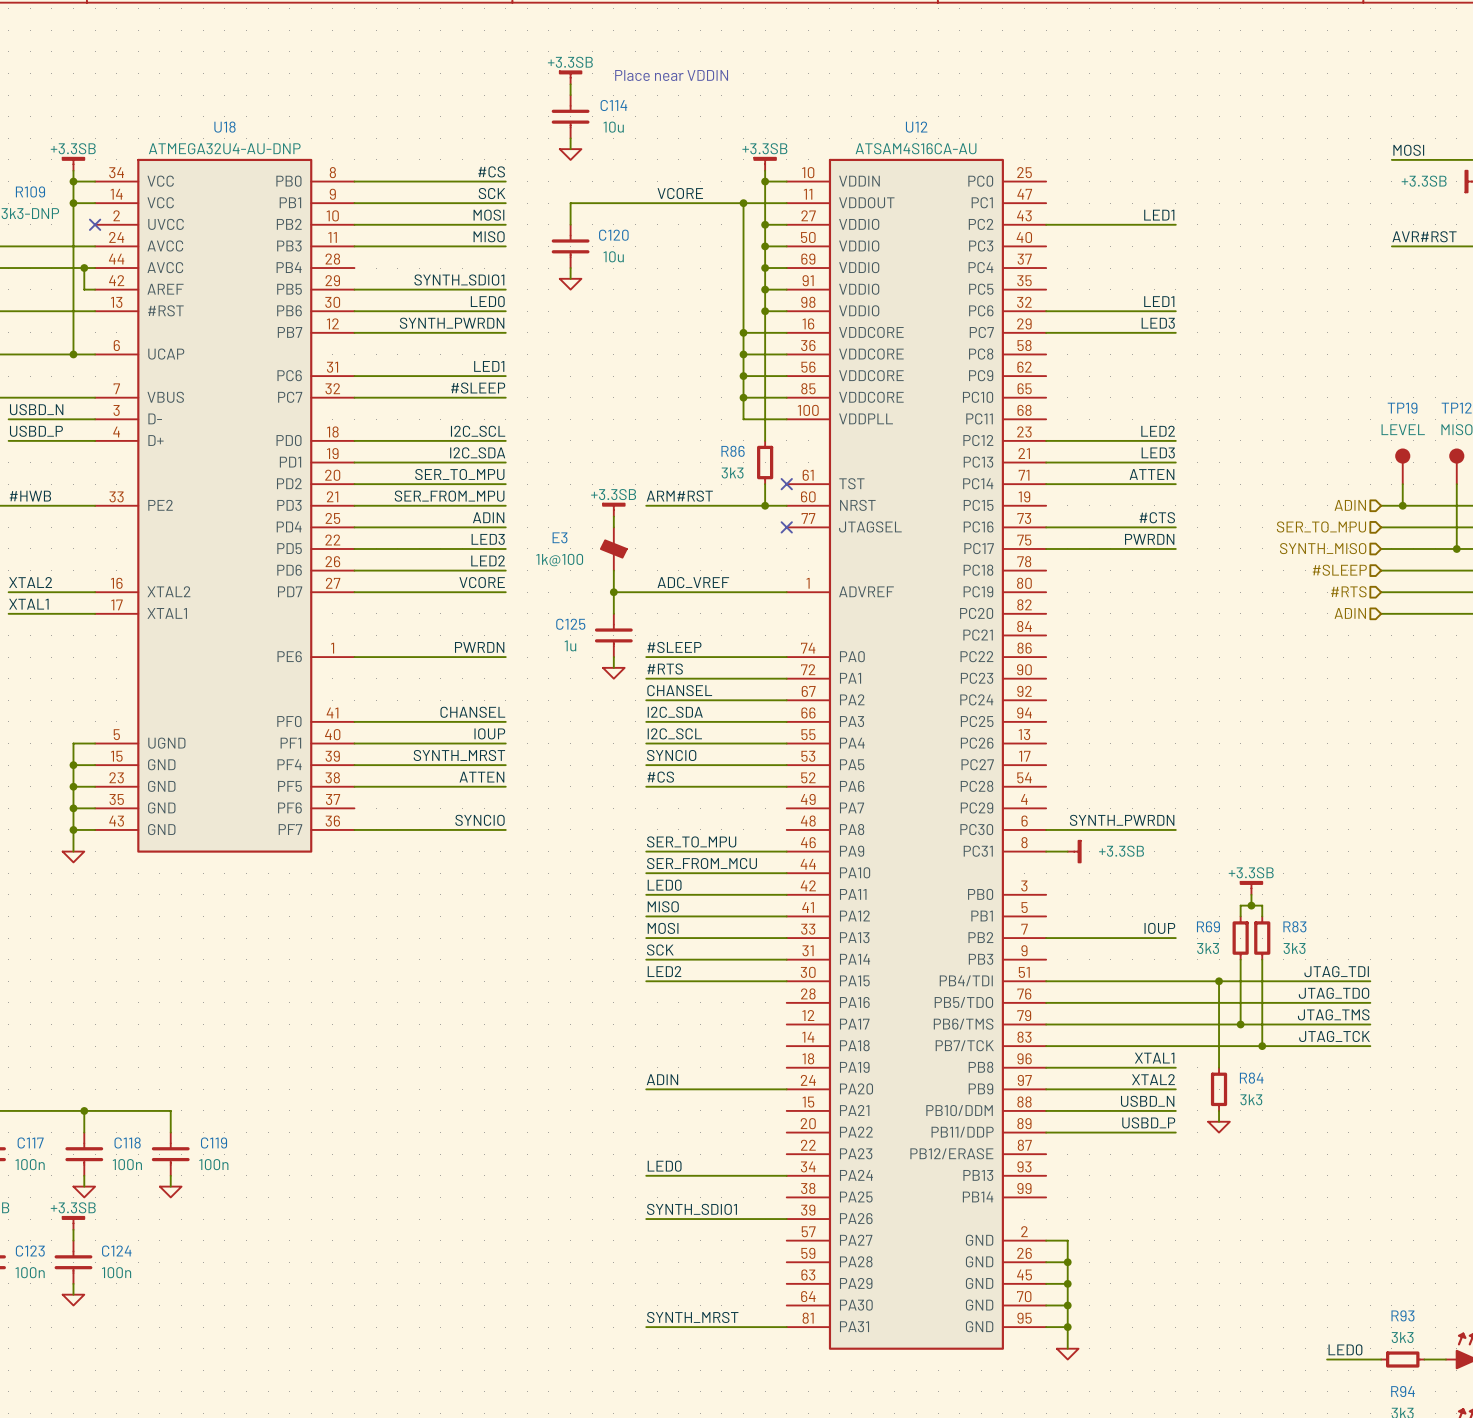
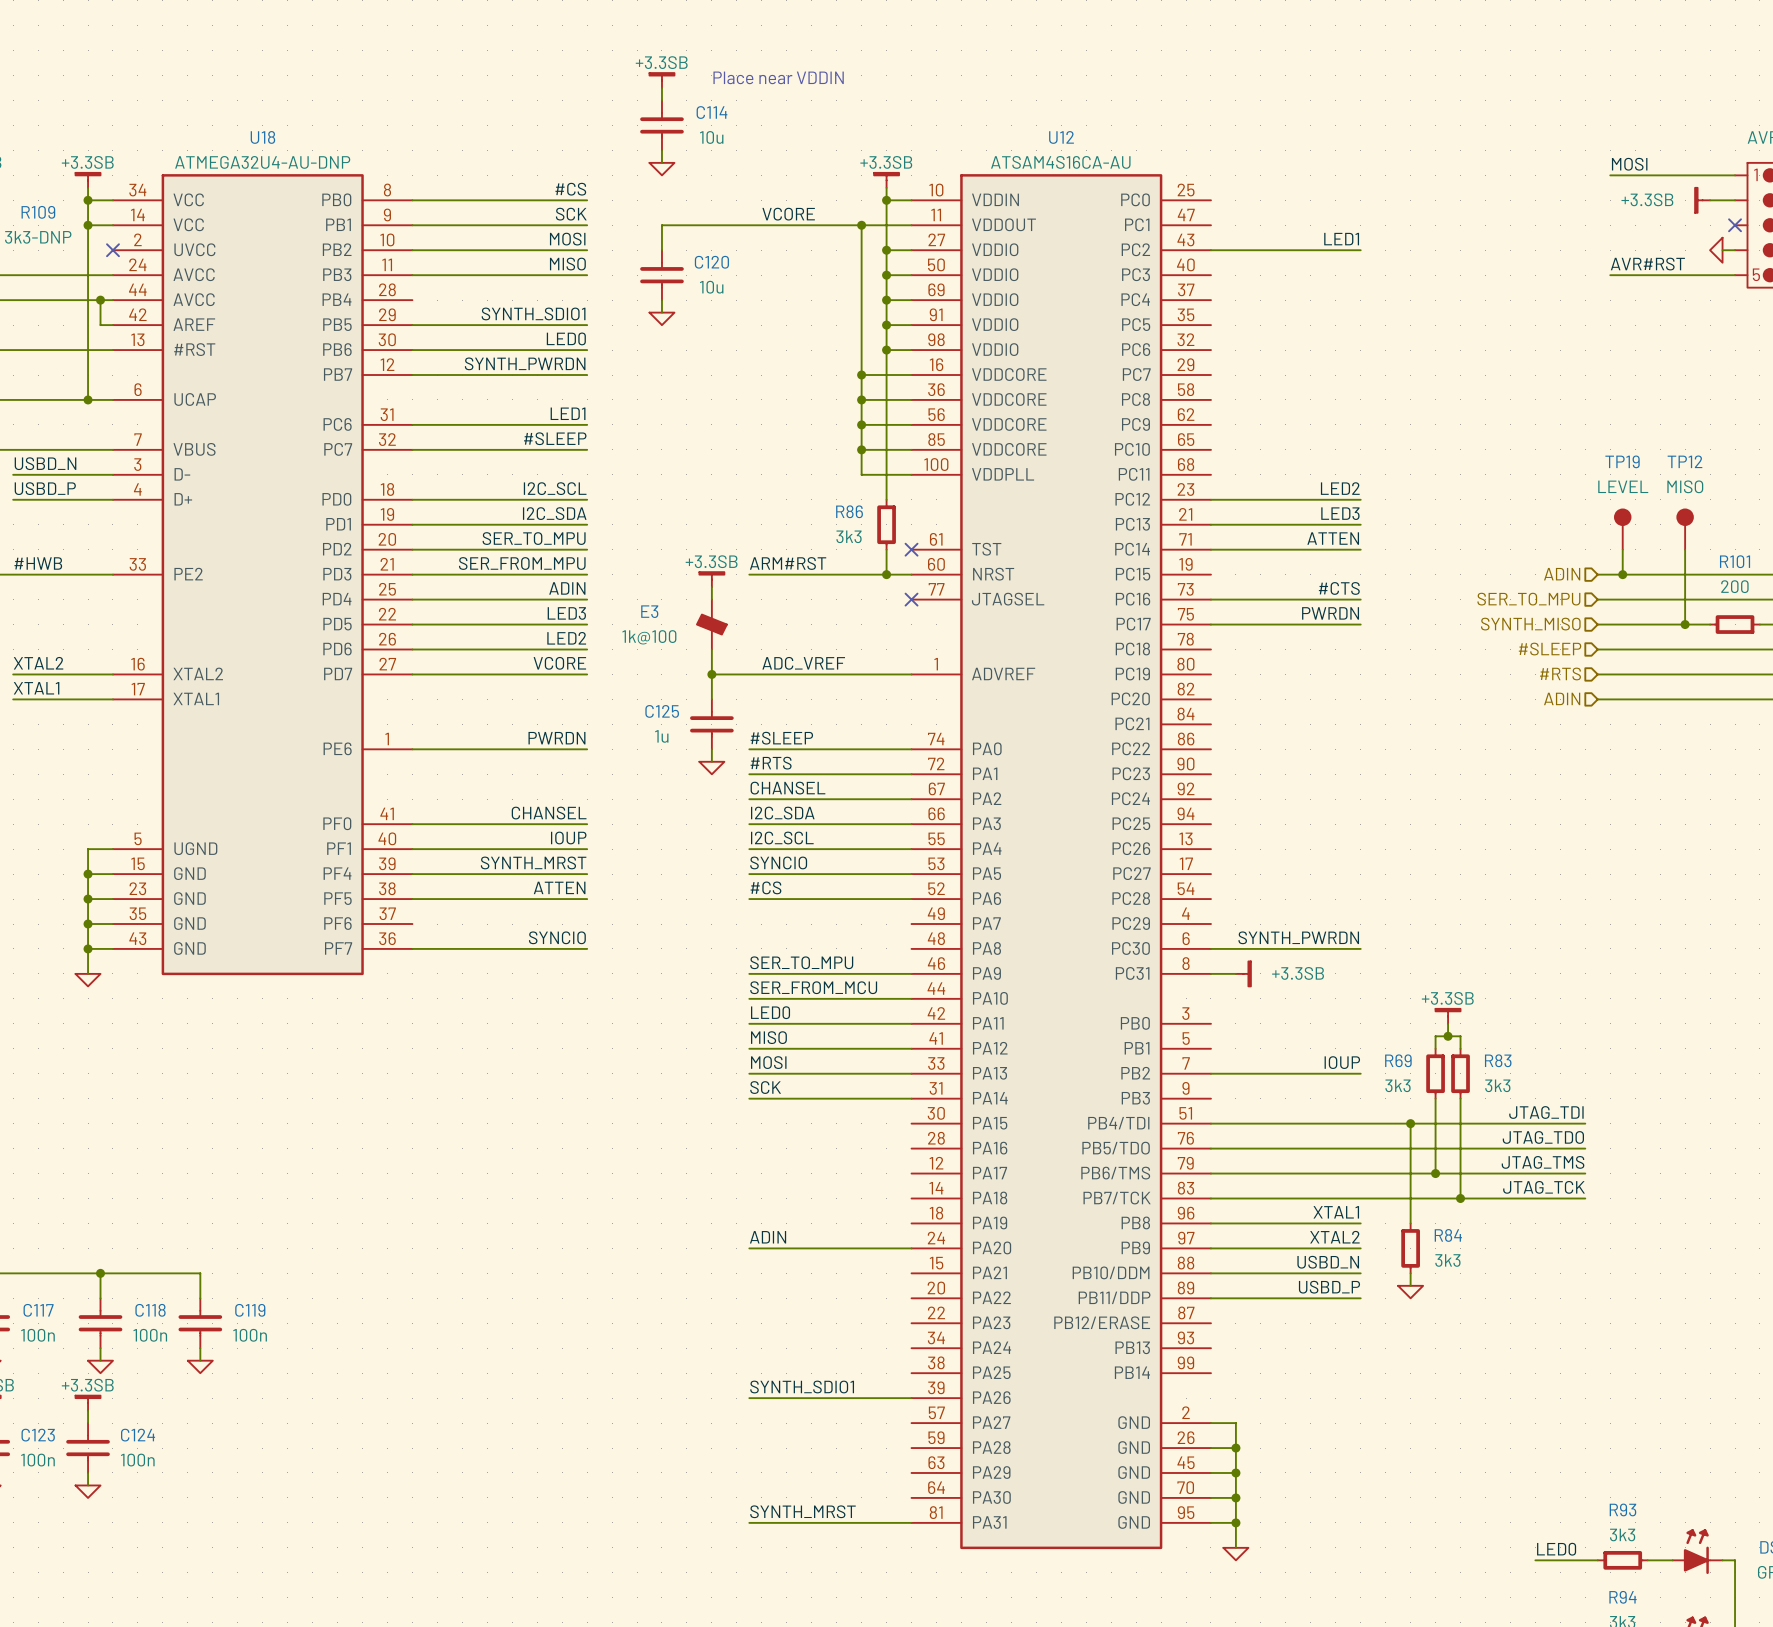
label: LED1 (1159, 301) -> none
wire: (1046, 311) (1175, 311) -> none
label: LED3 (1158, 323) -> none
wire: (1046, 332) (1175, 332) -> none
label: LED2 (664, 971) -> none
wire: (646, 981) (786, 981) -> none
label: LED0 (664, 1166) -> none
wire: (646, 1175) (786, 1175) -> none

